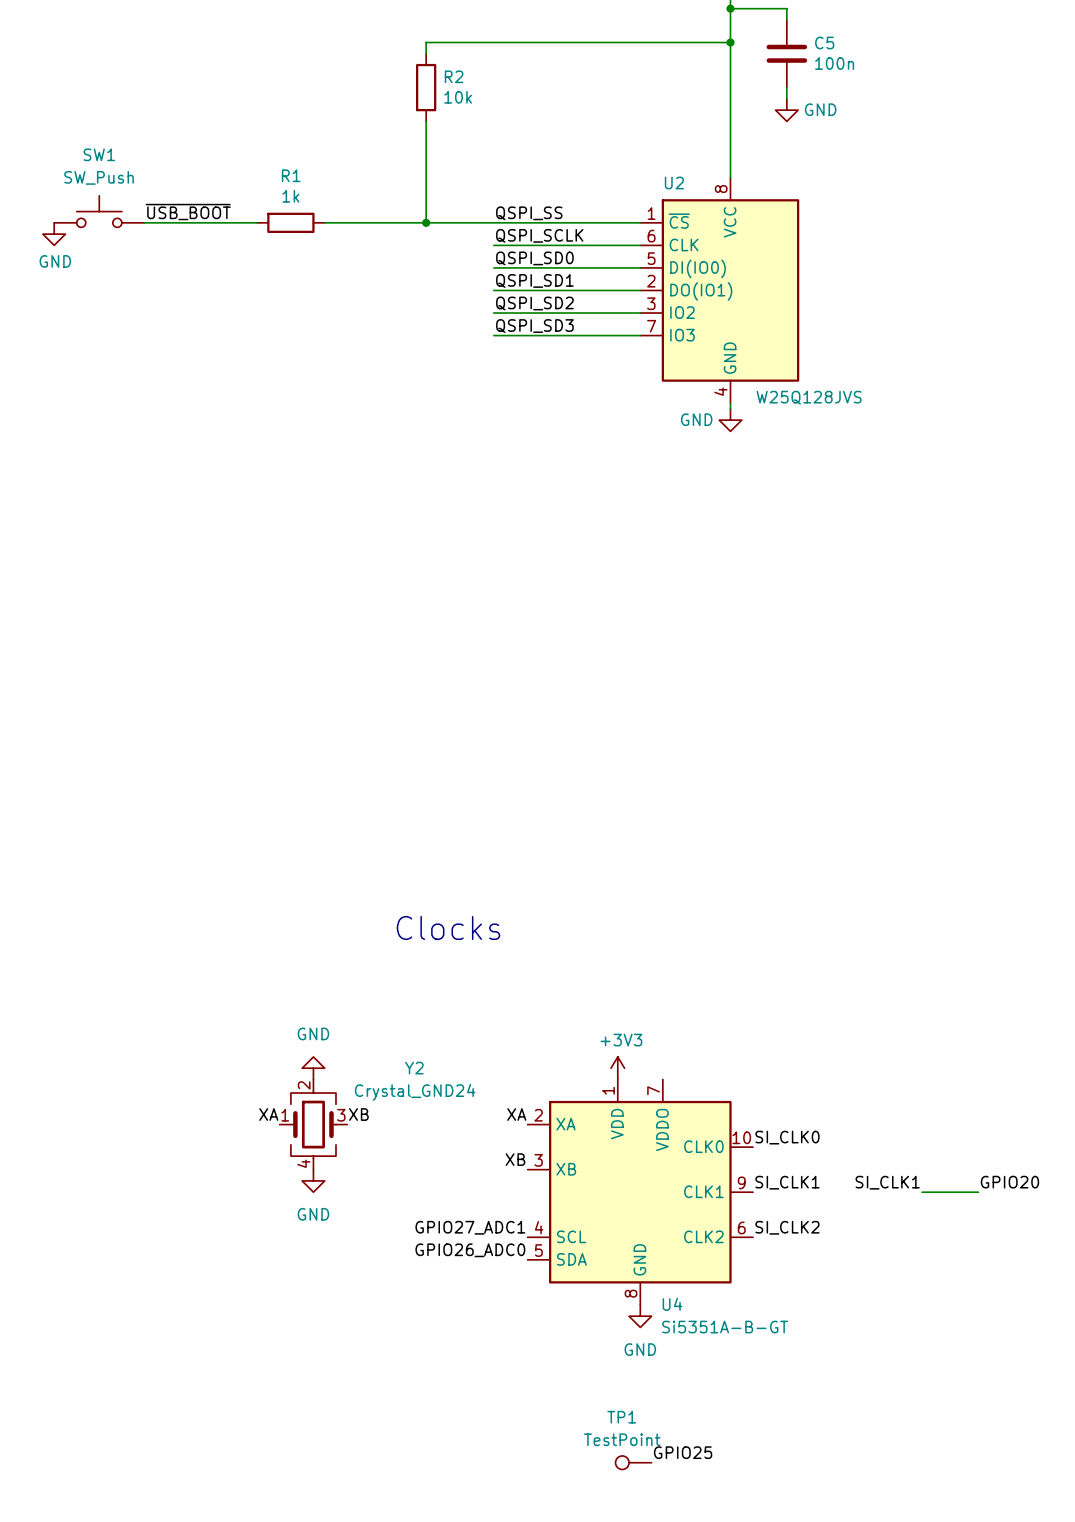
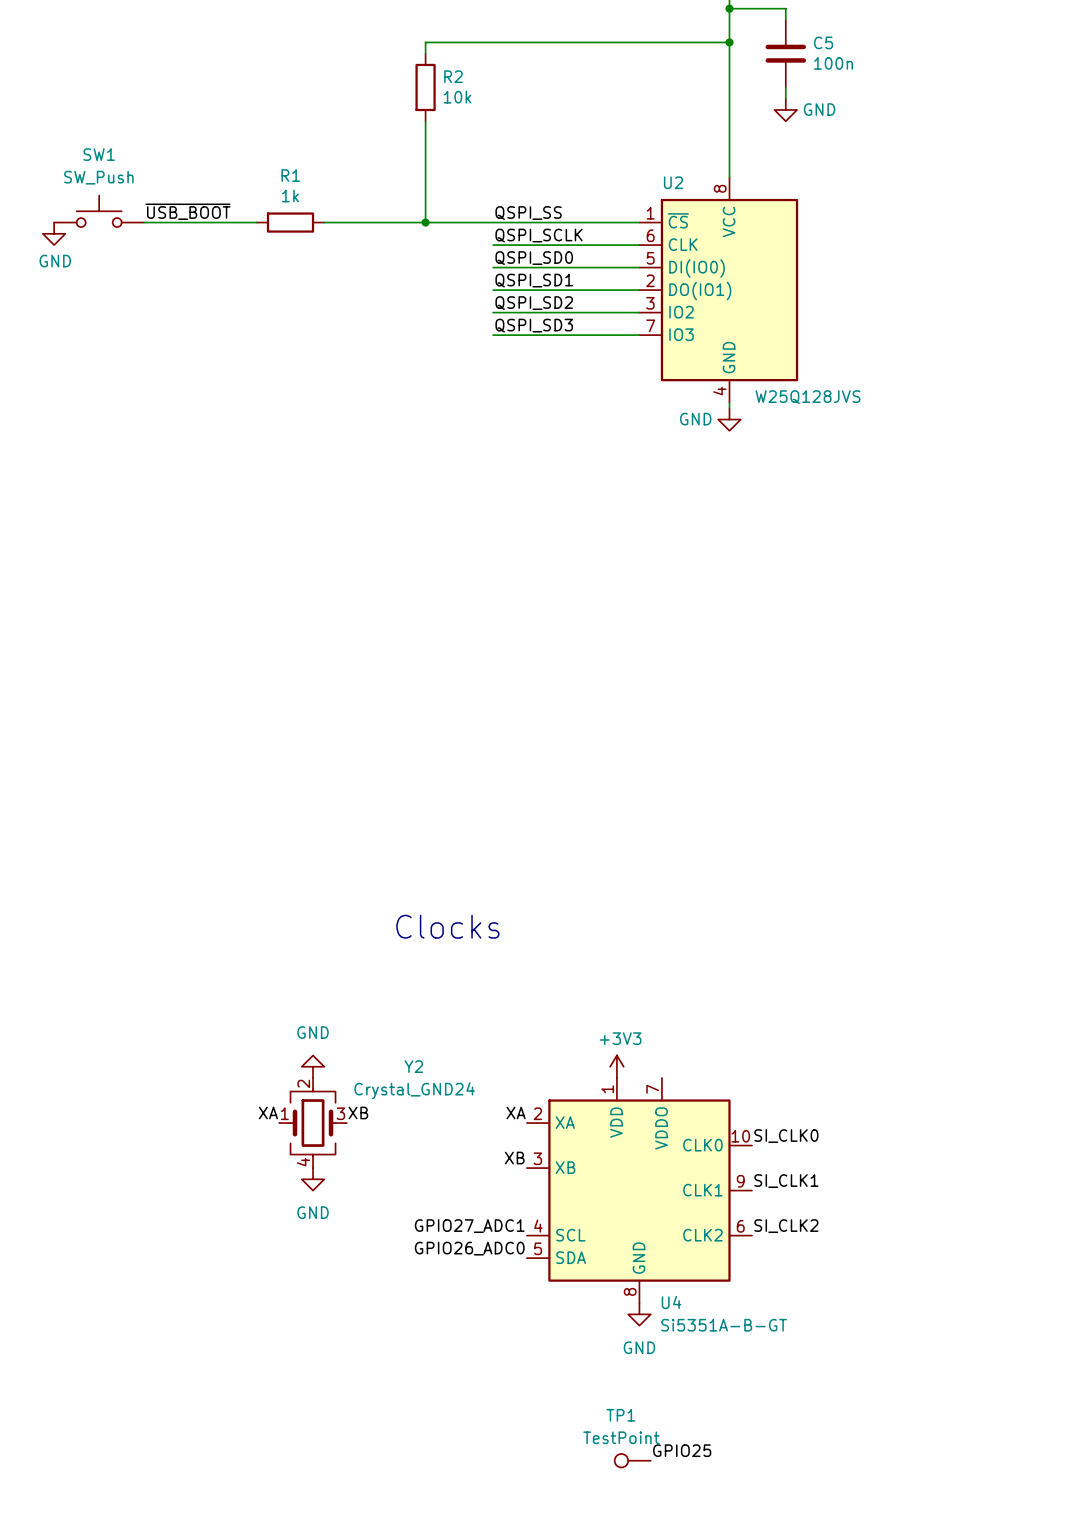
label: SI_CLK1 (887, 1182) -> none
label: GPIO20 (1009, 1182) -> none
wire: (922, 1192) (978, 1192) -> none

